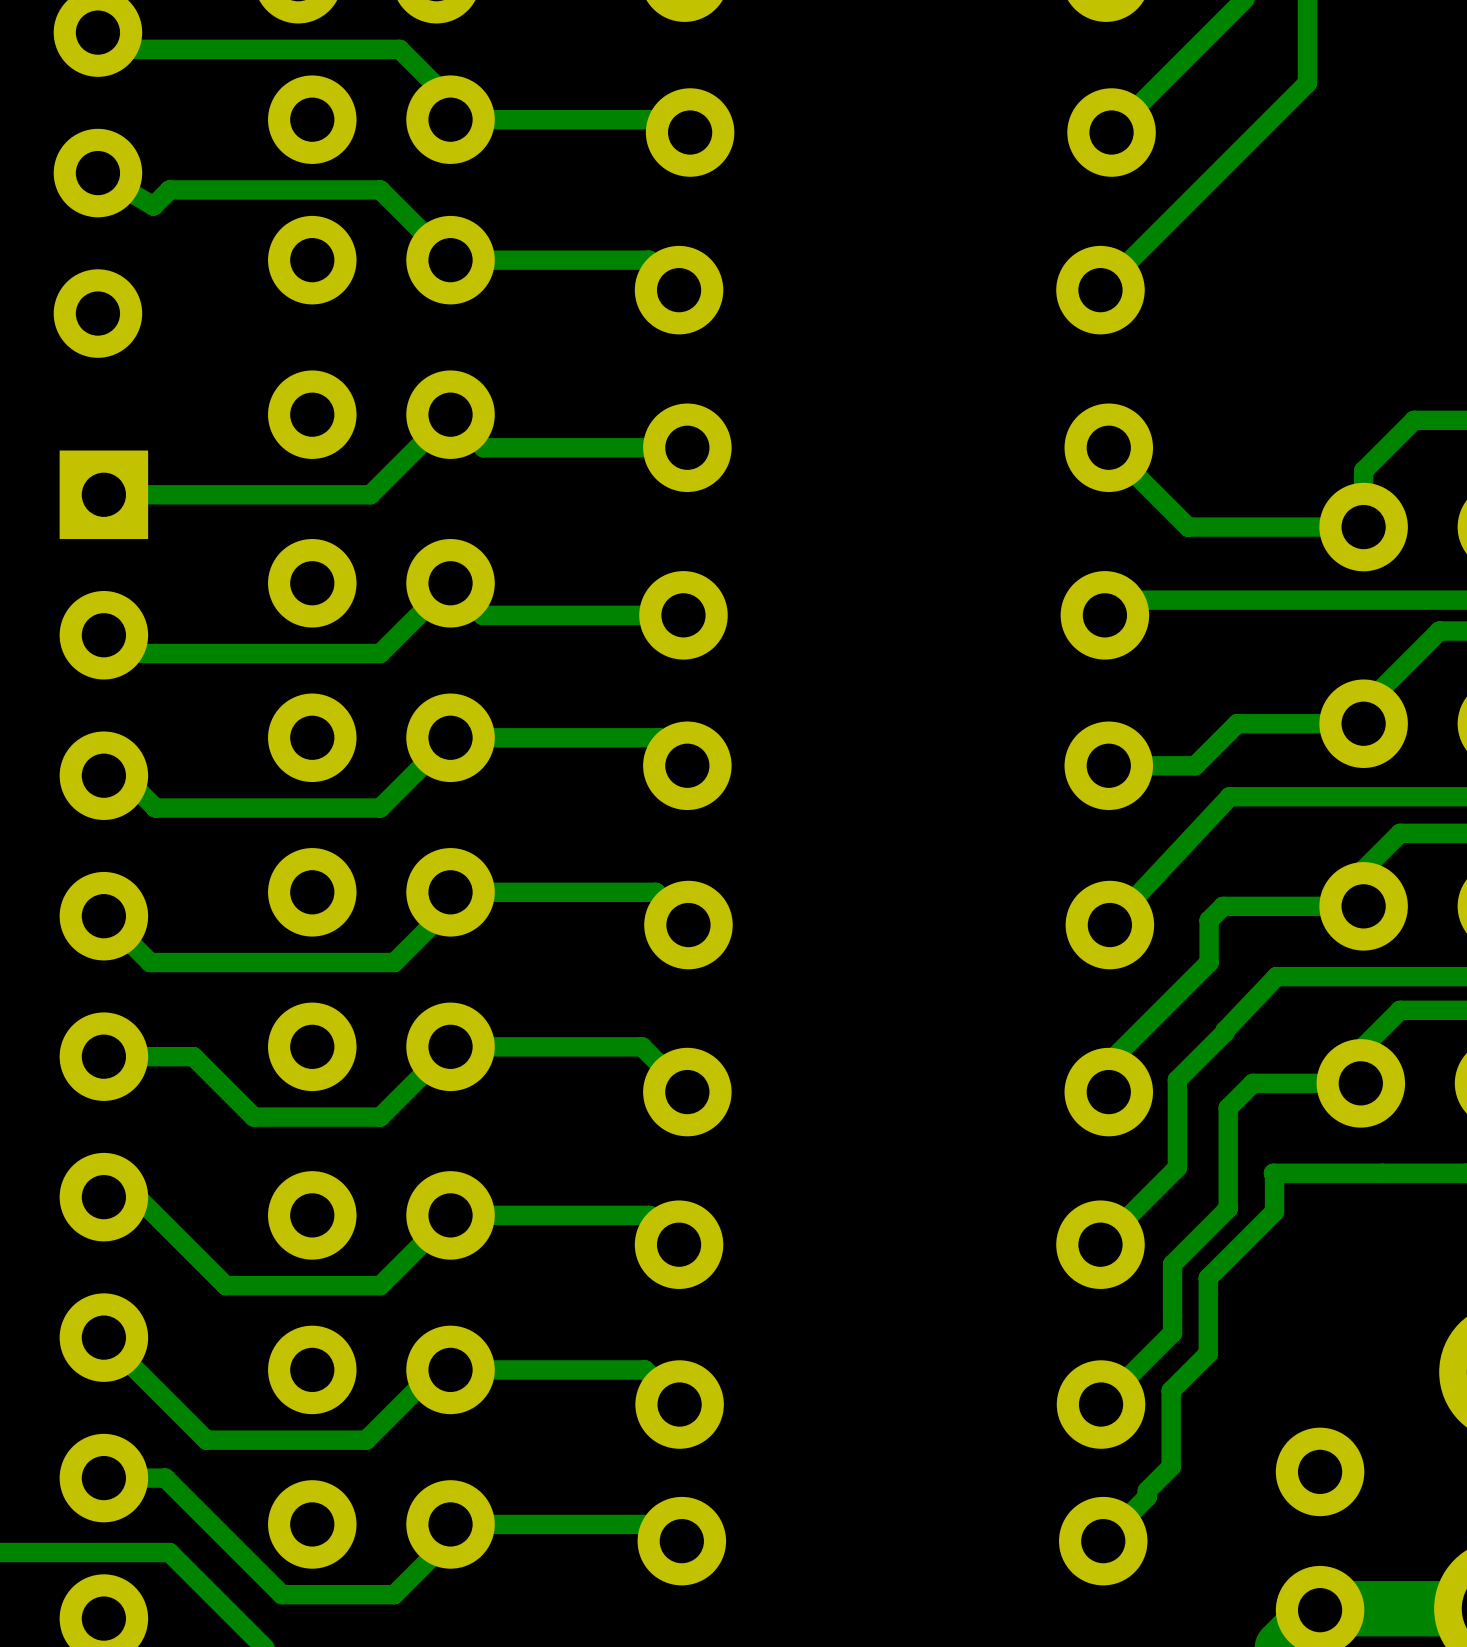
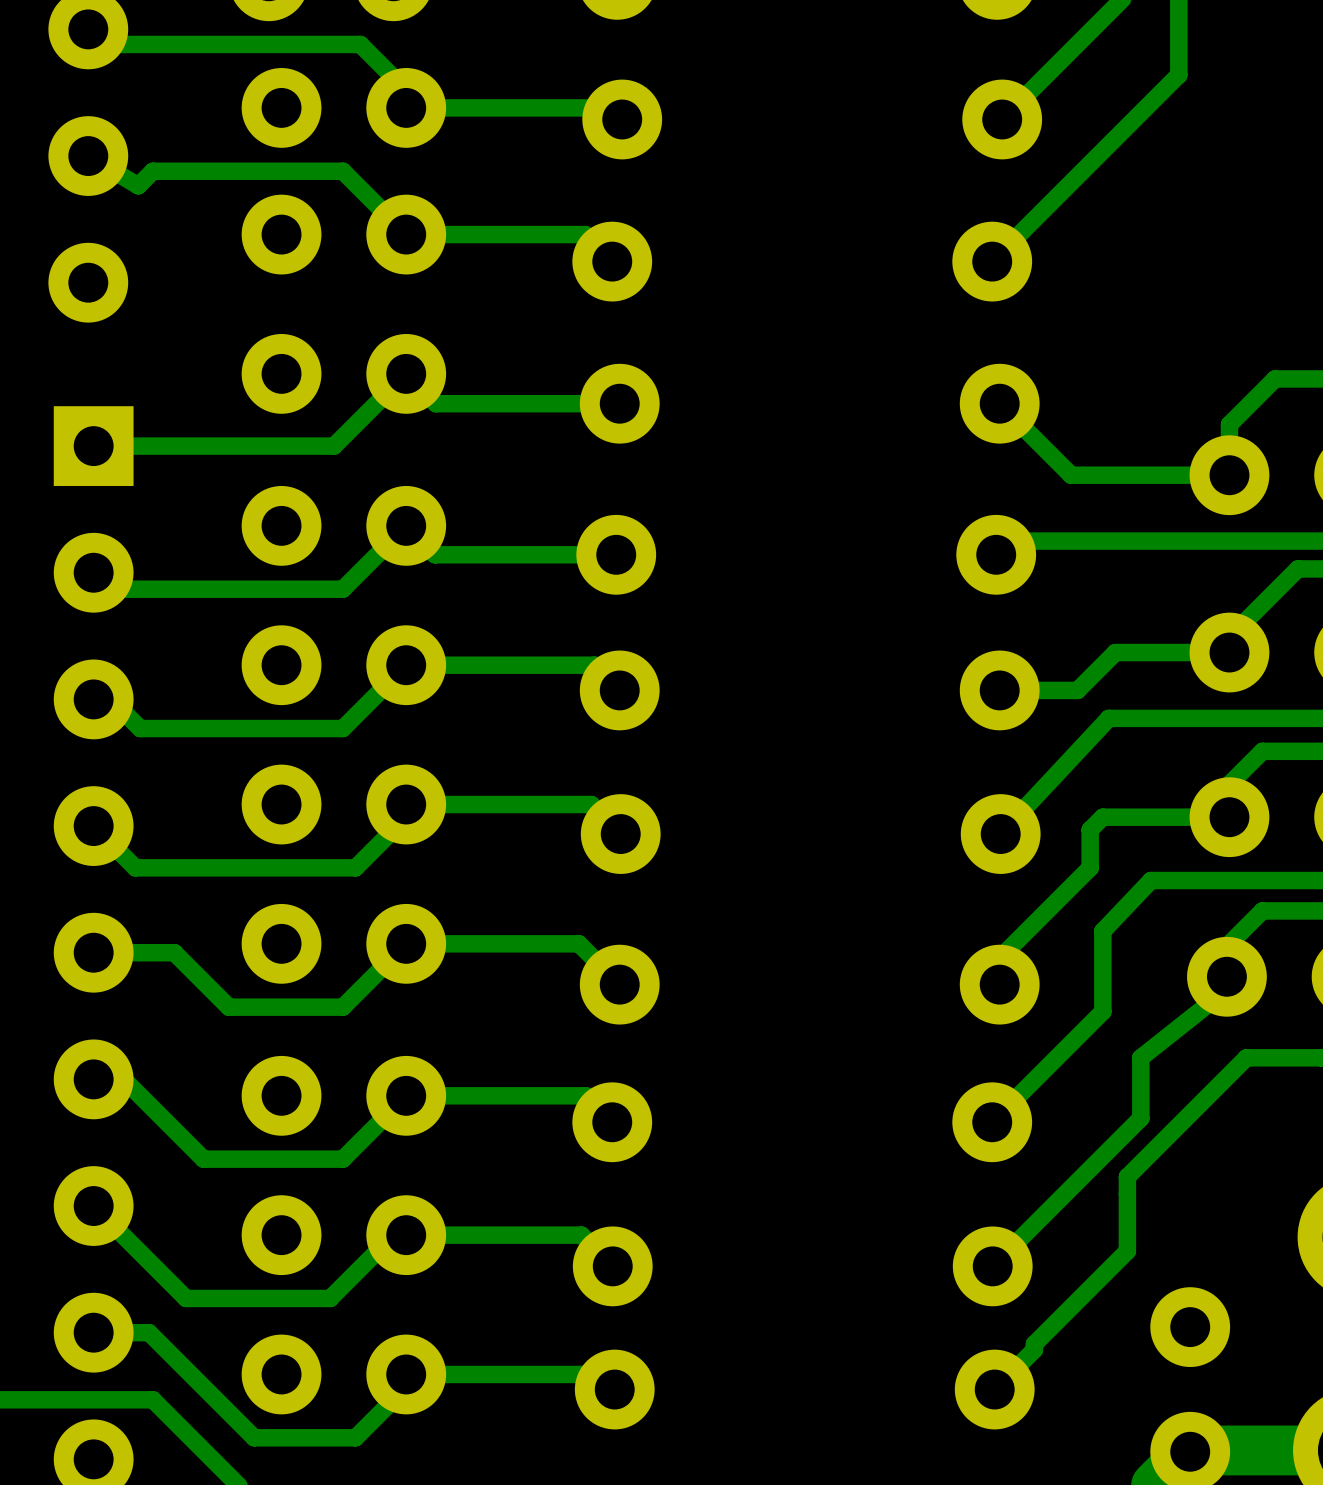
track: (1225, 1030) (1177, 1079) (1177, 1167) -> (1104, 929) (1102, 931) (1102, 1011) (1061, 1052)
track: (1360, 1083) (1252, 1083) (1228, 1108) (1228, 1208) (1172, 1264) (1172, 1332) -> (1226, 989) (1140, 1057) (1140, 1118) (1057, 1201)
track: (1382, 1173) (1273, 1173) (1274, 1211) (1208, 1278) (1208, 1353) (1171, 1390) (1171, 1466) -> (1246, 1057) (1127, 1176) (1127, 1251) (1055, 1322)

